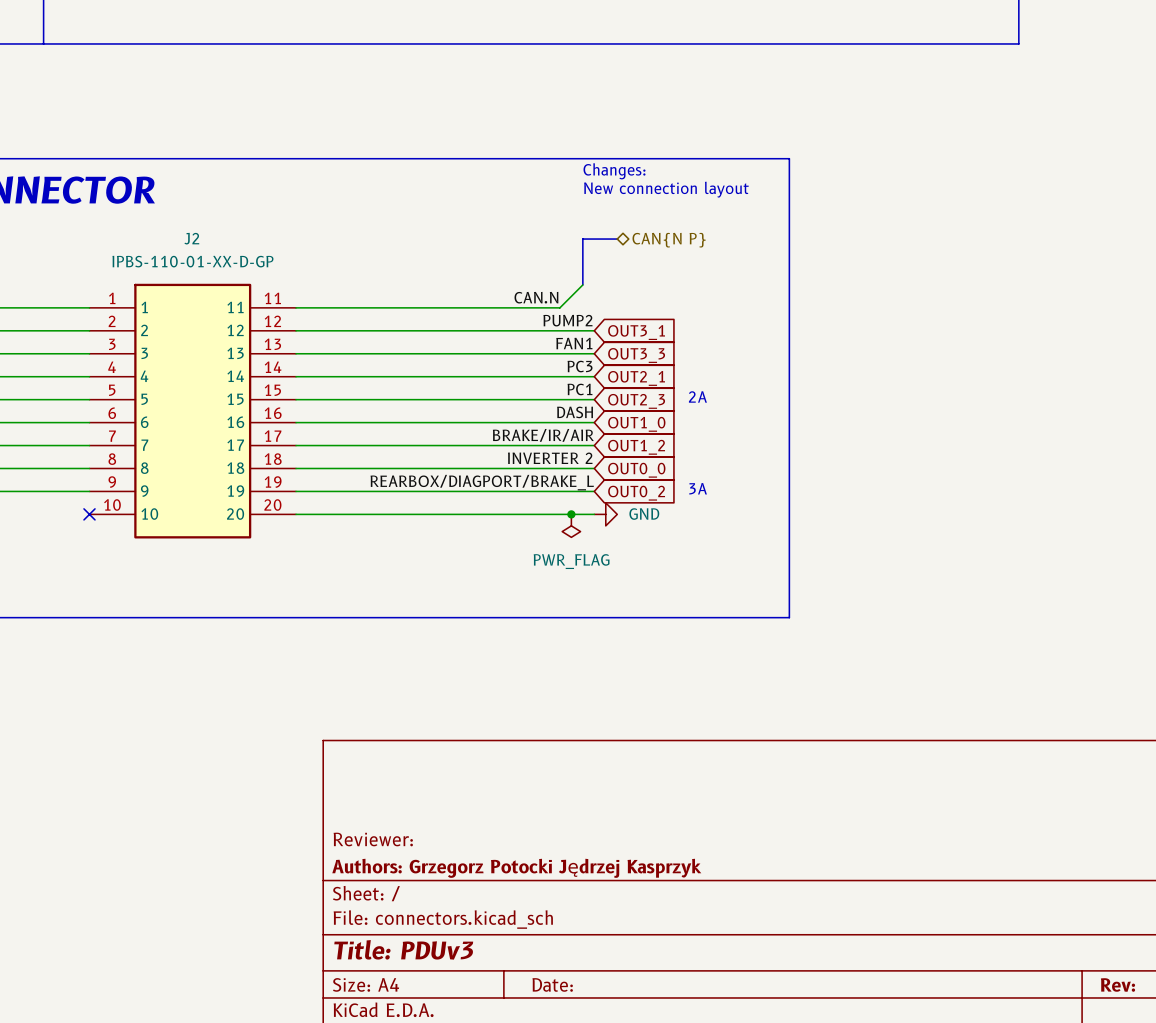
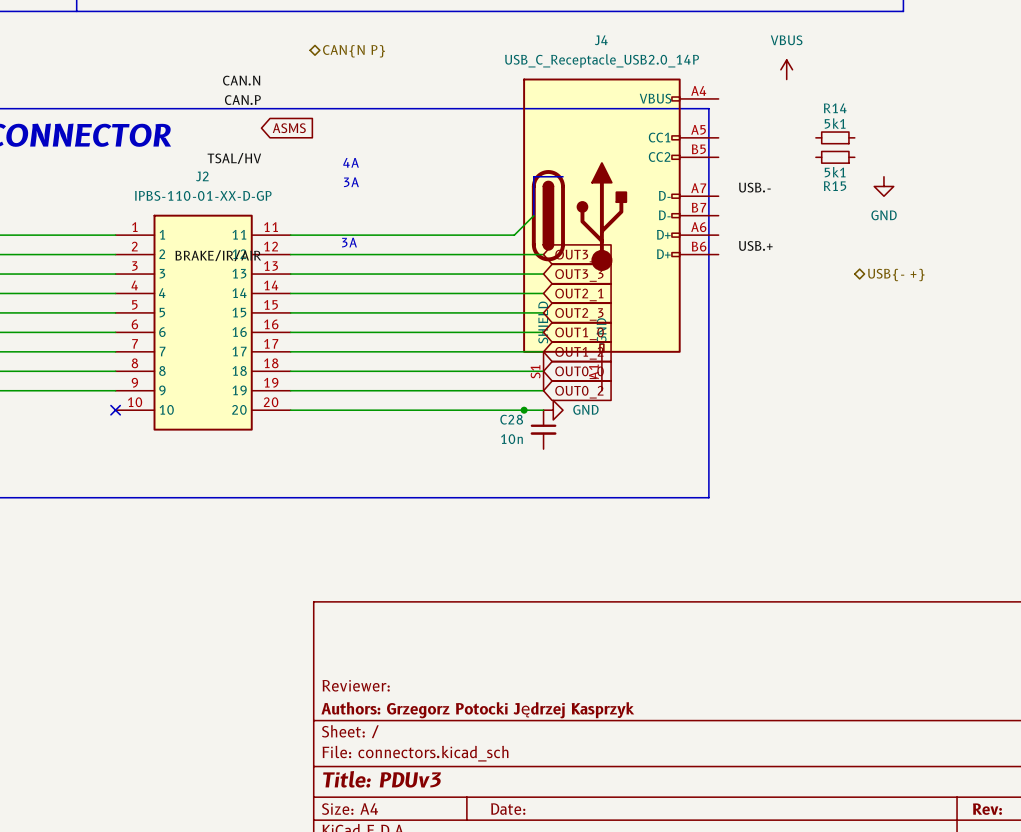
hierarchical label: none -> CAN{N P} (354, 51)
power symbol: none -> VBUS (786, 69)
label: none -> CAN.N (241, 80)
label: none -> CAN.P (242, 100)
text: Changes: (614, 171) -> none
global label: none -> ASMS (289, 128)
text: New connection layout (666, 189) -> none
R14: none -> 5k1 (835, 137)
R15: none -> 5k1 (835, 157)
label: none -> TSAL/HV (234, 158)
text: none -> 4A (351, 162)
hierarchical label: CAN{N P} (669, 240) -> none
text: none -> 3A (351, 182)
power symbol: none -> GND (883, 186)
label: none -> USB.- (754, 187)
label: CAN.N (536, 297) -> none
J4: none -> USB_C_Receptacle_USB2.0_14P (620, 234)
text: none -> 3A (349, 242)
label: PUMP2 (567, 320) -> none
label: none -> USB.+ (755, 245)
label: none -> BRAKE/IR/AIR (218, 255)
label: FAN1 (574, 343) -> none
hierarchical label: none -> USB{- +} (896, 275)
label: PC3 (580, 366) -> none
label: PC1 (580, 389) -> none
text: 2A (697, 396) -> none
label: DASH (575, 412) -> none
label: BRAKE/IR/AIR (543, 435) -> none
label: INVERTER 2 (550, 458) -> none
label: REARBOX/DIAGPORT/BRAKE_L (482, 482) -> none
text: 3A (698, 488) -> none
power symbol: PWR_FLAG (571, 525) -> none
C28: none -> 10n (543, 429)

